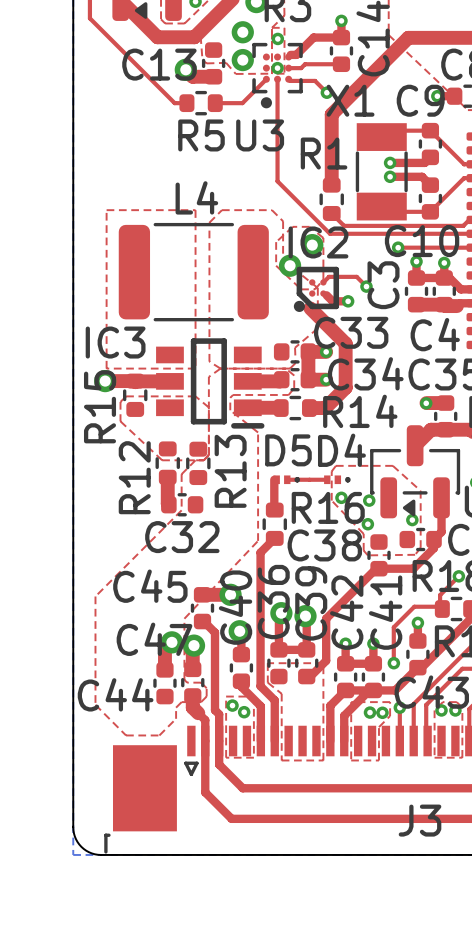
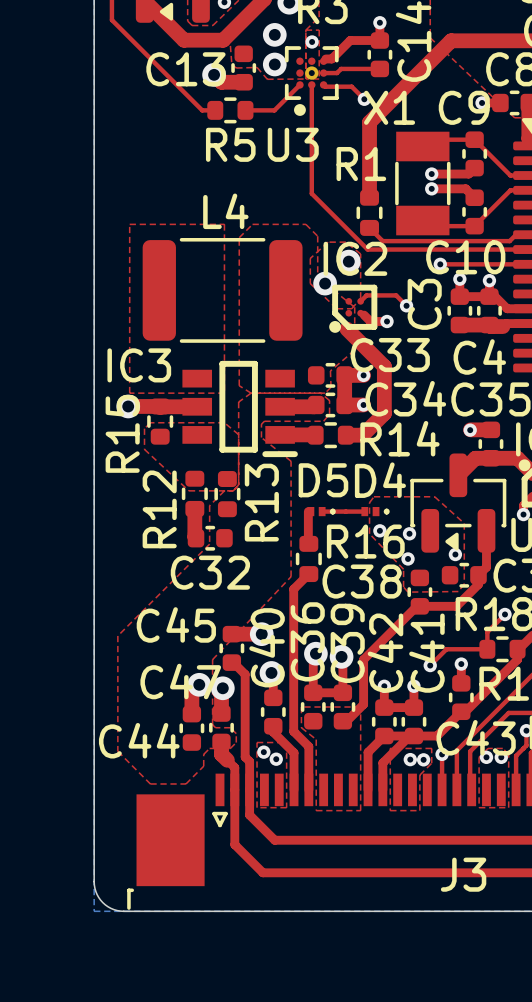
top track: (442, 592) (440, 595) (440, 606) (414, 606) (393, 627) (393, 663) -> (487, 632) (487, 649) (446, 649) (430, 665)
via position: (393, 663) -> (430, 665)

